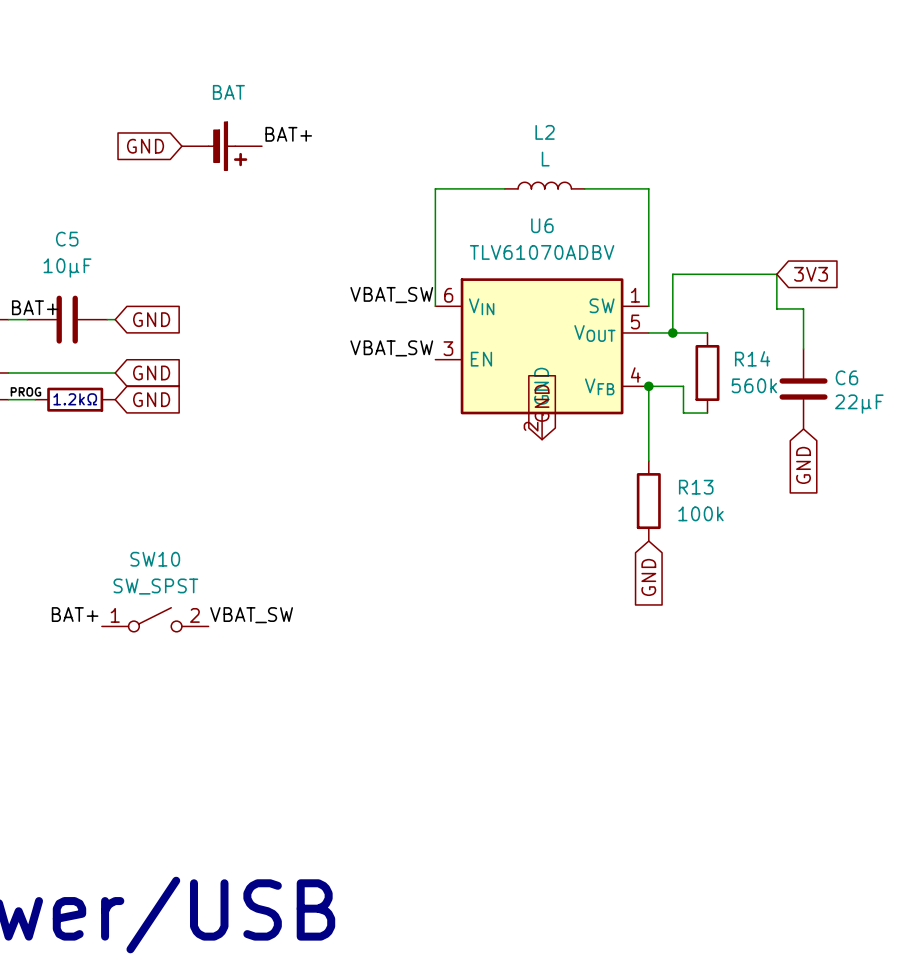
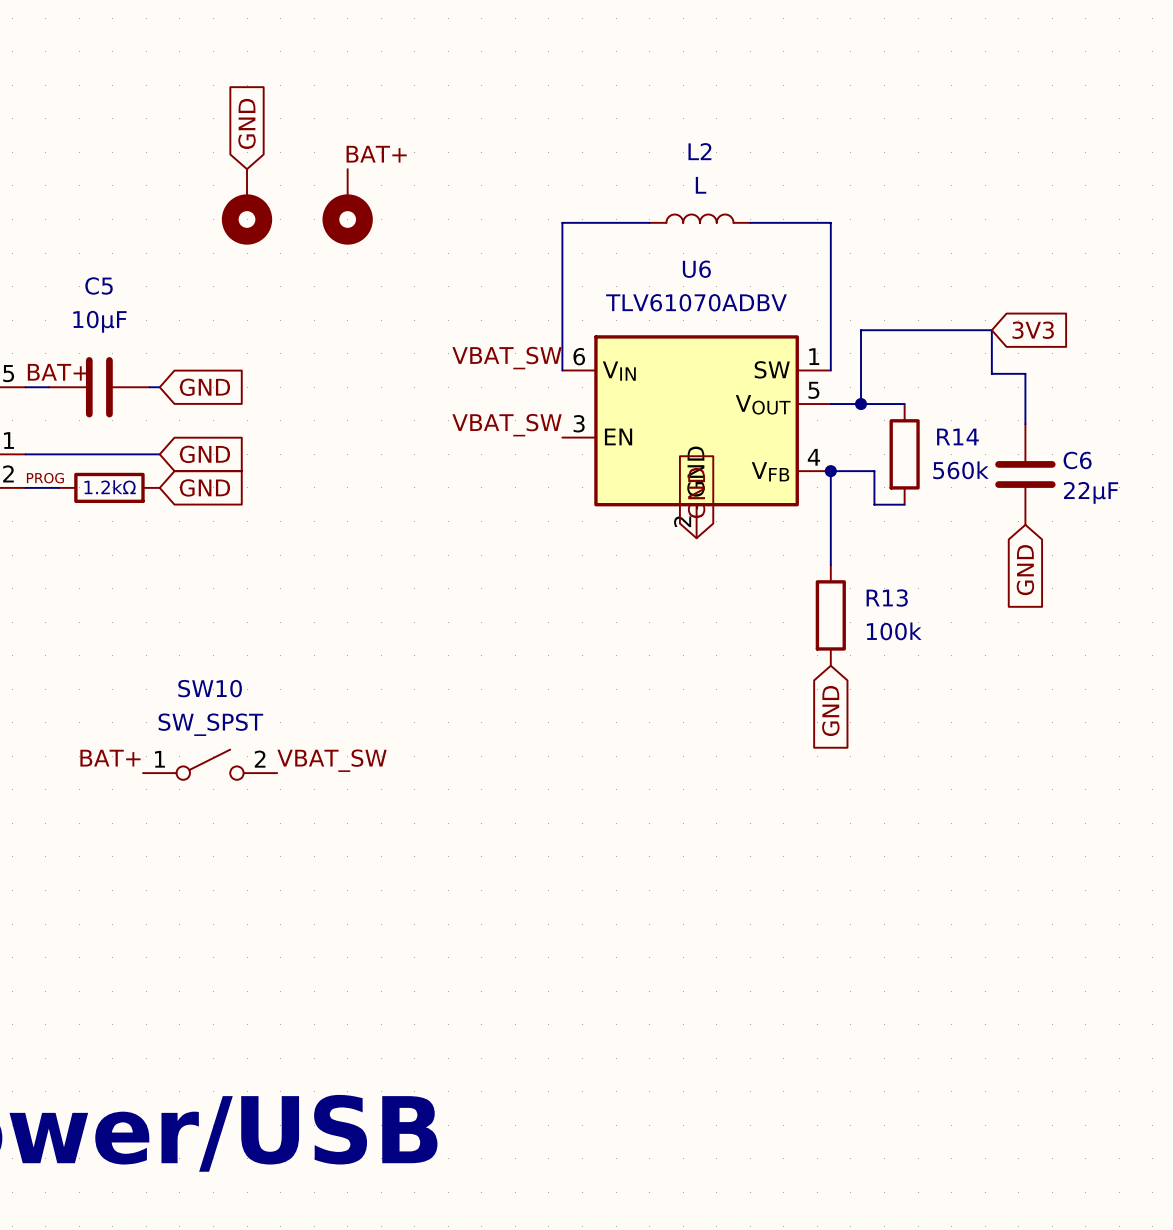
global label rotation: 0° (145, 146) -> 90° clockwise (247, 123)
part: BAT (221, 146) -> none
part: none -> (247, 206)
part: none -> (347, 206)

